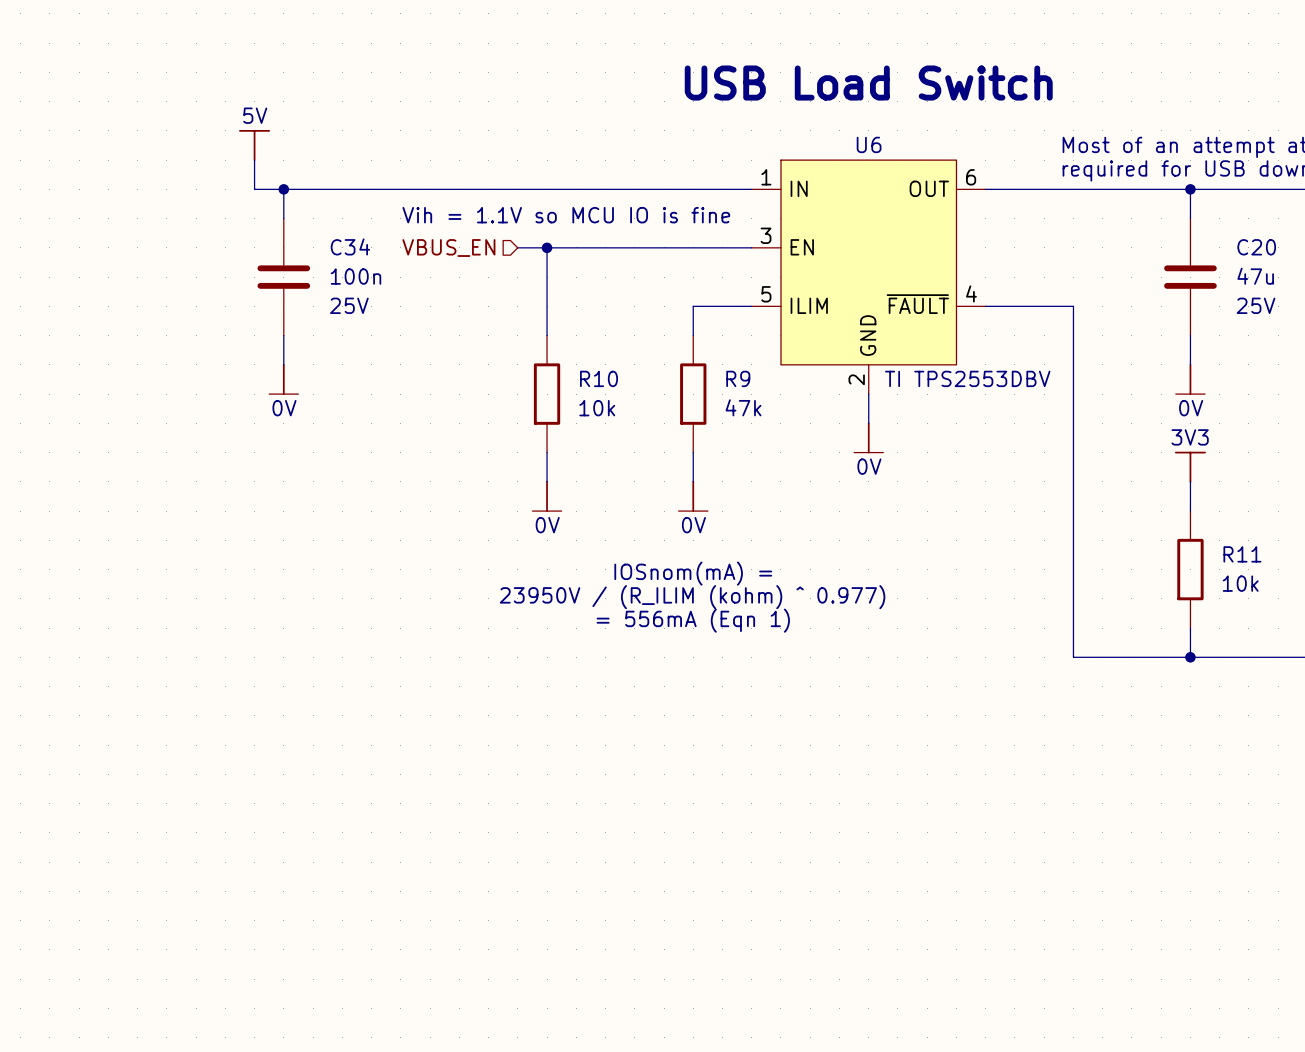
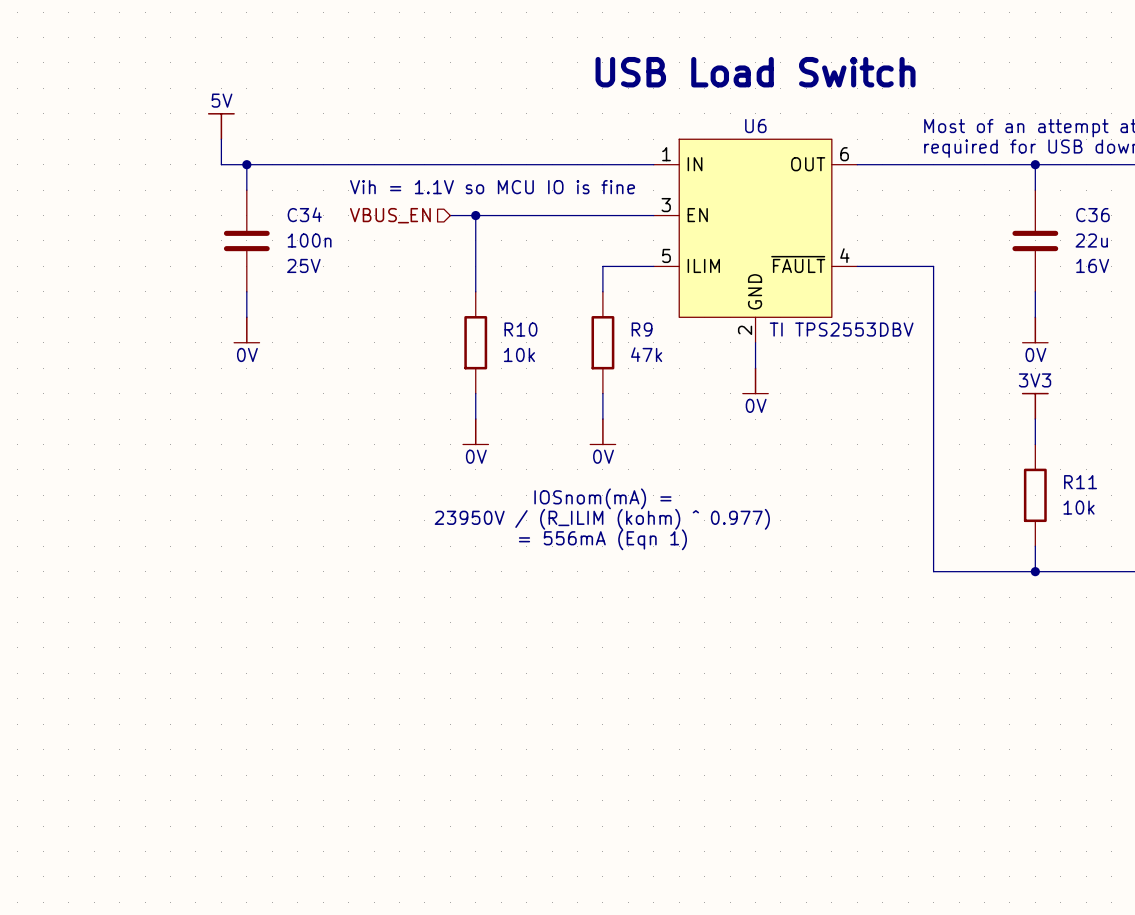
C20 name: C20 (1256, 247) -> C36 (1092, 215)
C20 value: 47u (1255, 276) -> 22u (1091, 240)
C20 text: 25V (1256, 305) -> 16V (1092, 265)

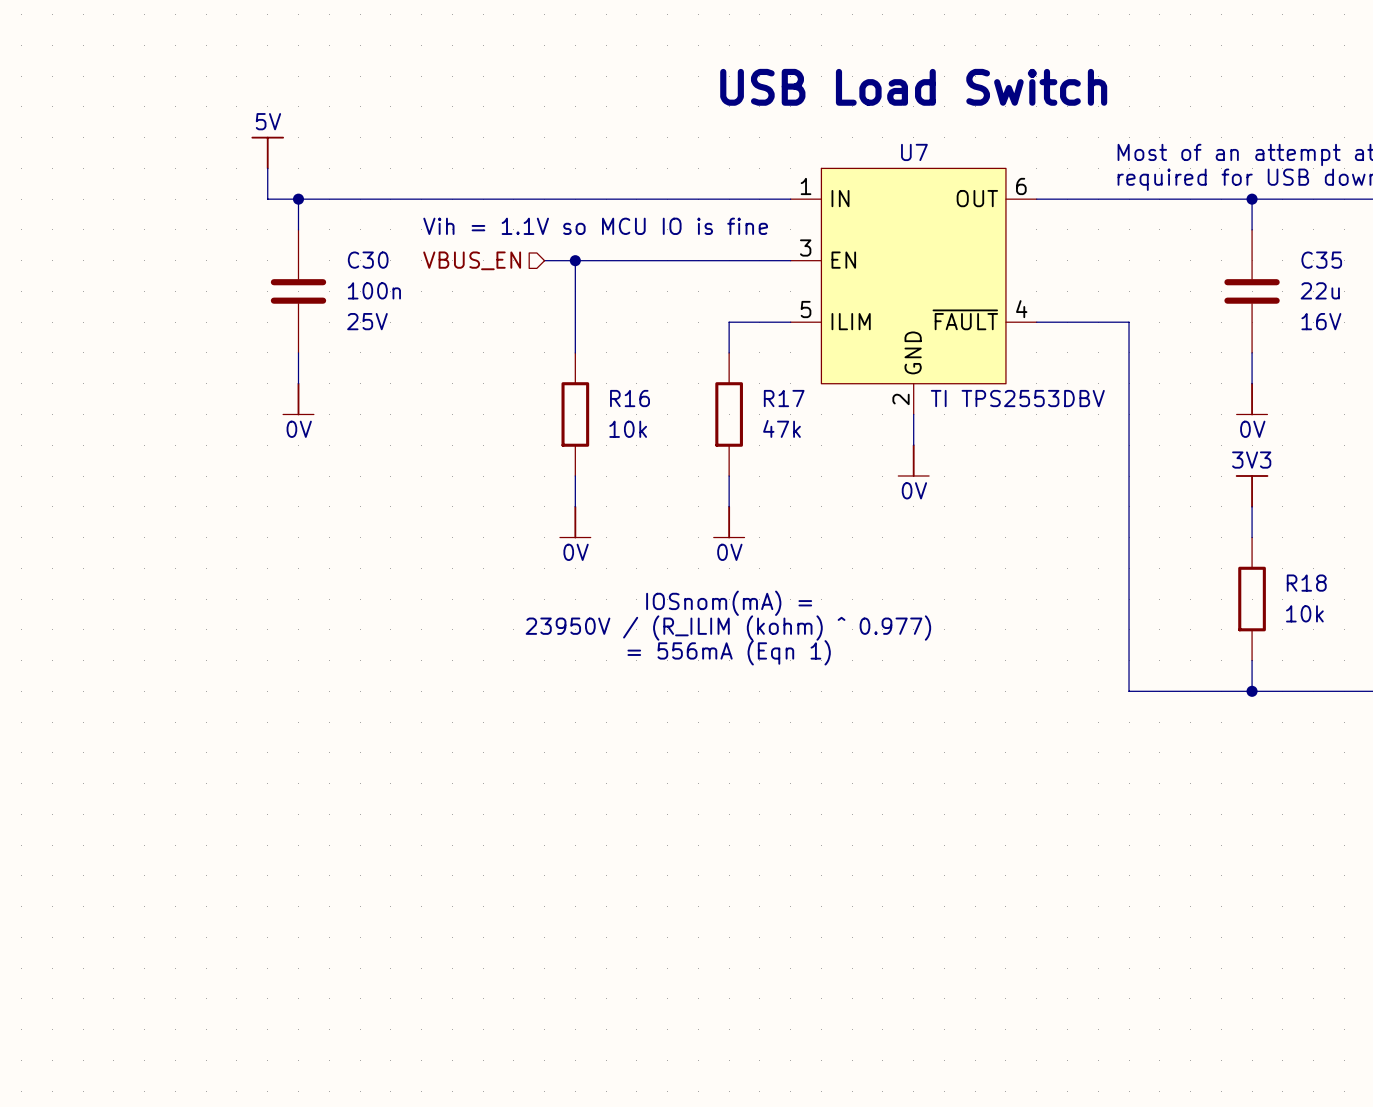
U6 name: U6 (755, 126) -> U7 (914, 152)
C34 name: C34 (304, 214) -> C30 (368, 260)
C36 name: C36 (1092, 215) -> C35 (1321, 260)
R10 name: R10 (520, 329) -> R16 (630, 398)
R9 name: R9 (642, 329) -> R17 (784, 398)
R11 name: R11 (1080, 482) -> R18 (1306, 583)

